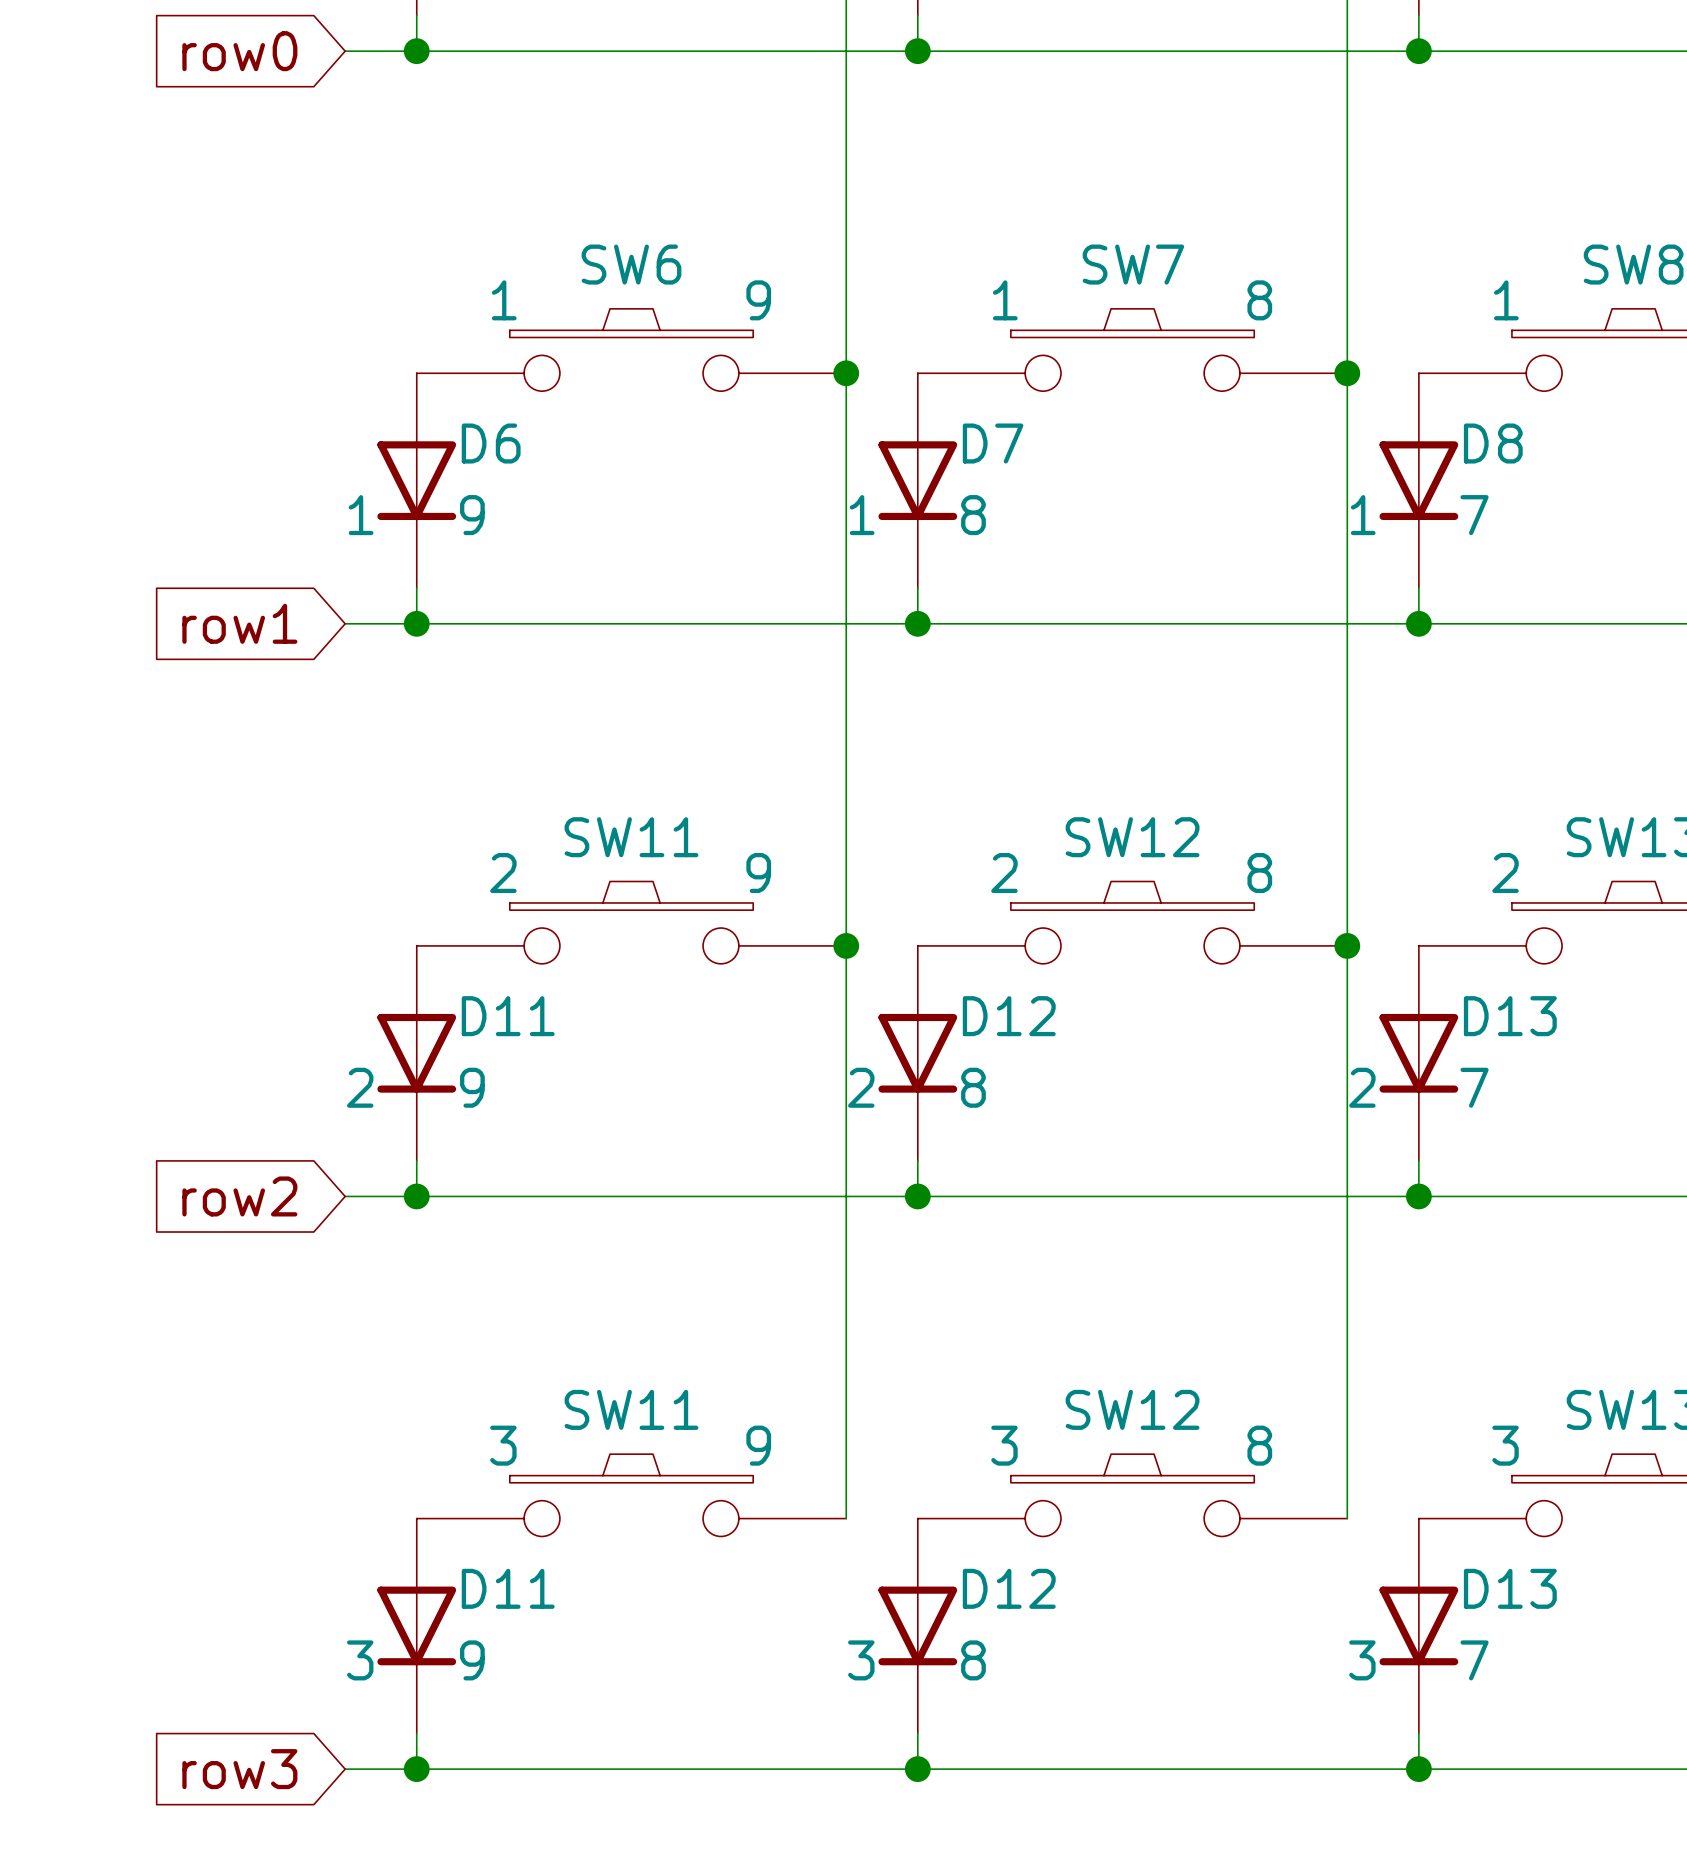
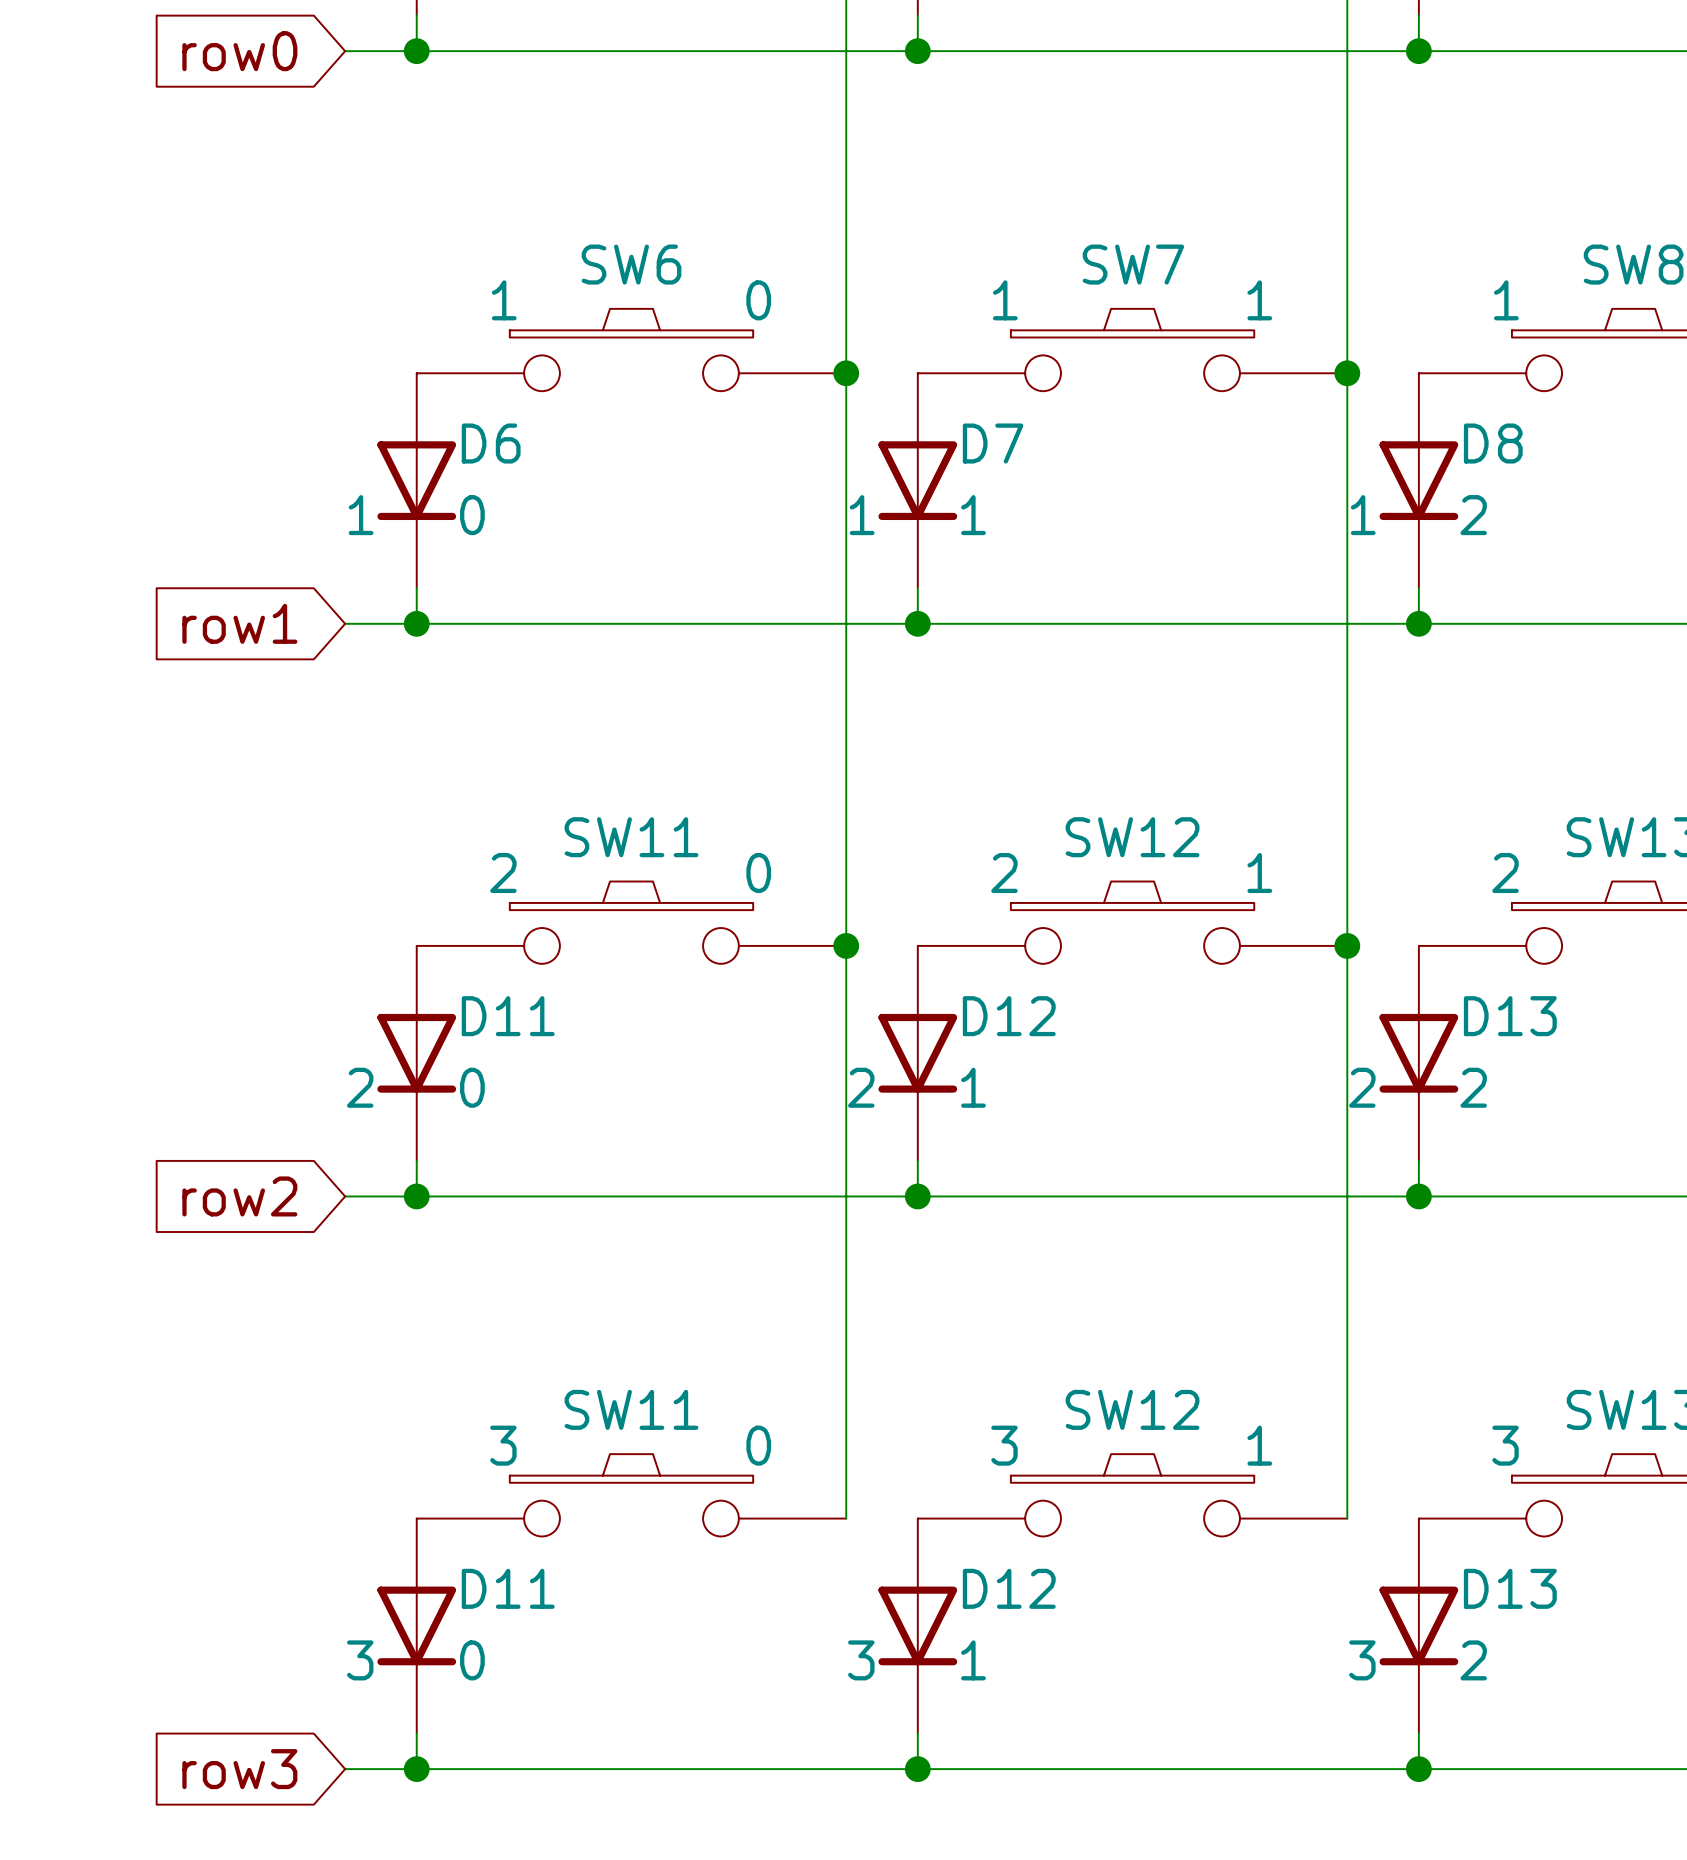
SW6 text: 9 (758, 300) -> 0 (758, 300)
SW7 text: 8 (1259, 300) -> 1 (1259, 300)
D6 text: 9 (472, 515) -> 0 (472, 515)
D7 text: 8 (973, 515) -> 1 (973, 515)
D8 text: 7 (1474, 515) -> 2 (1473, 515)
SW11 text: 9 (758, 873) -> 0 (758, 873)
SW12 text: 8 (1259, 873) -> 1 (1259, 873)
D11 text: 9 (472, 1087) -> 0 (472, 1087)
D12 text: 8 (973, 1087) -> 1 (973, 1087)
D13 text: 7 (1474, 1087) -> 2 (1473, 1087)
SW11 text: 9 (758, 1445) -> 0 (758, 1445)
SW12 text: 8 (1259, 1445) -> 1 (1259, 1445)
D11 text: 9 (472, 1660) -> 0 (472, 1660)
D12 text: 8 (973, 1660) -> 1 (973, 1660)
D13 text: 7 (1474, 1660) -> 2 (1473, 1660)

